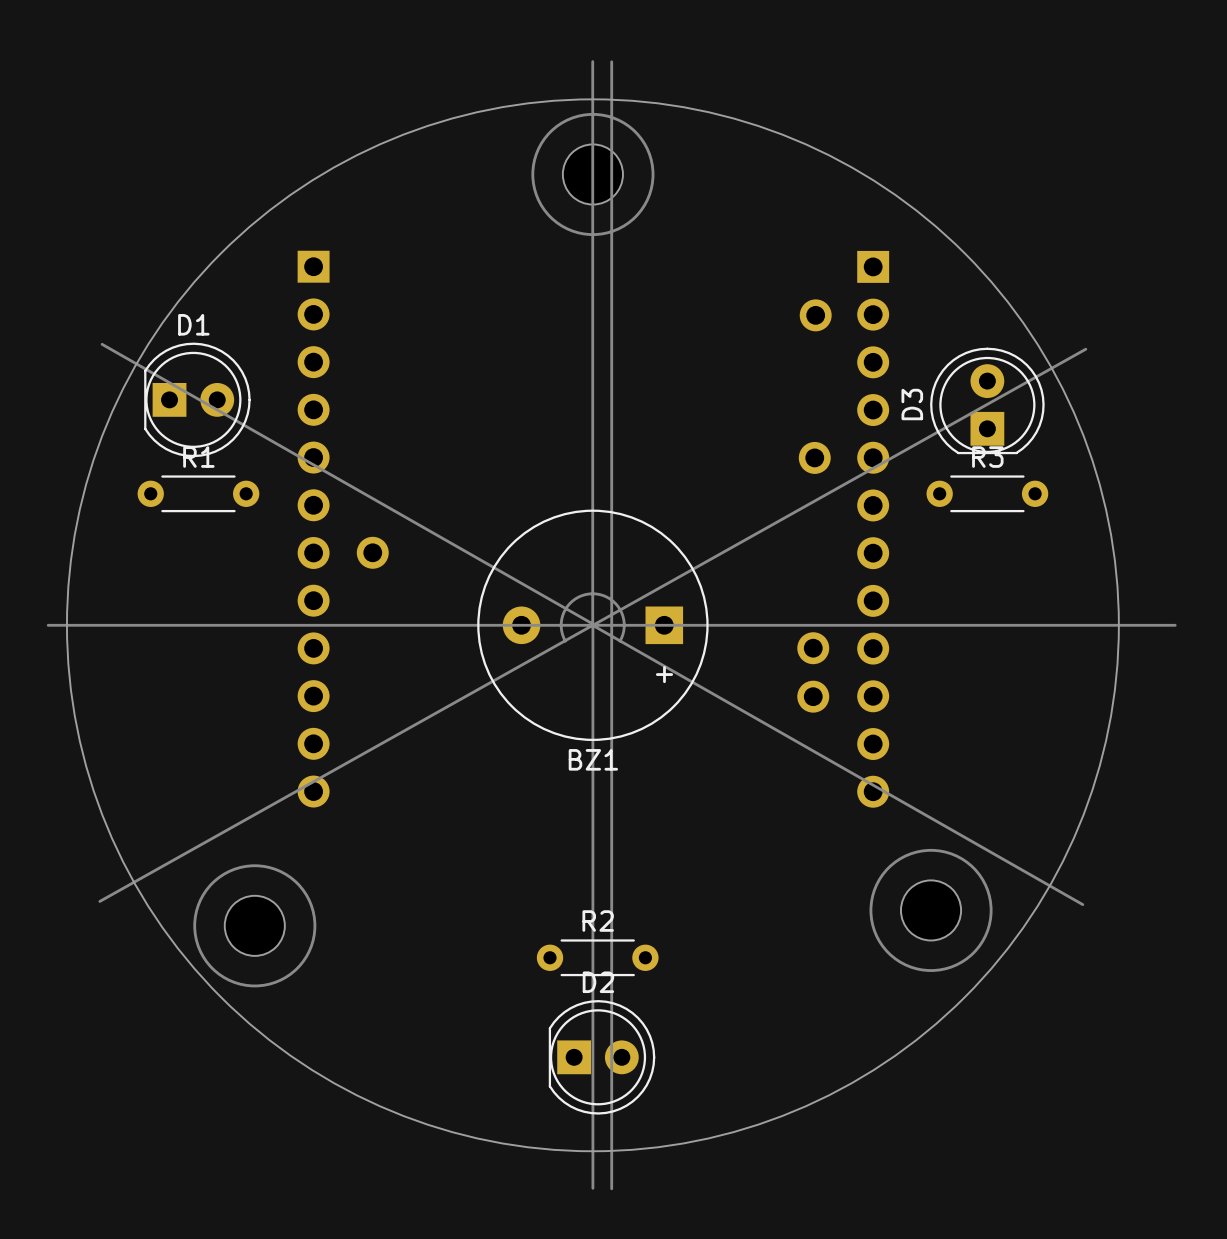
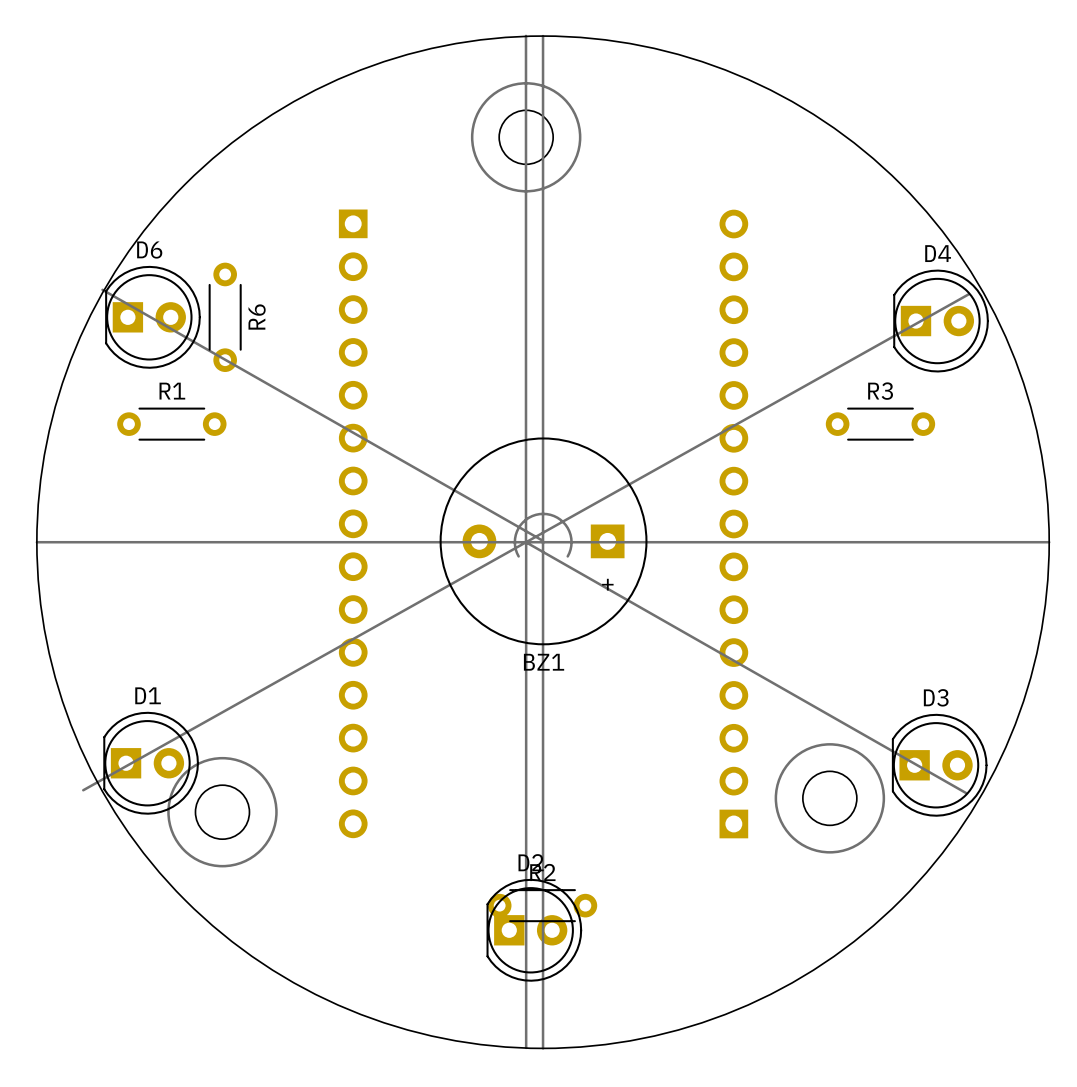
round board edge size: [66, 98, 1120, 1153] -> [36, 35, 1051, 1050]
part: (815, 315) -> none
line: (102, 344) (592, 623) -> (102, 289) (542, 540)
D6: none -> (152, 317)
R6: none -> (225, 317)
D4: none -> (941, 321)
D1 position: (197, 399) -> (151, 763)
D3 rotation: 0° (987, 400) -> 90° clockwise (939, 765)
D3 position: (987, 400) -> (939, 765)
part: (814, 457) -> none
part: (313, 529) -> none
part: (873, 529) -> none
part: (372, 552) -> none
part: none -> (353, 523)
part: none -> (733, 524)
BZ1 position: (592, 625) -> (543, 541)
line: (565, 641) (561, 627) (565, 609) (578, 597) (592, 593) (610, 598) (620, 609) (624, 627) (620, 641) -> none
line: none -> (518, 556) (514, 542) (518, 528) (529, 517) (543, 513) (557, 517) (567, 528) (571, 542) (567, 556)
part: (813, 648) -> none
part: (813, 696) -> none
R2 position: (597, 957) -> (542, 905)

